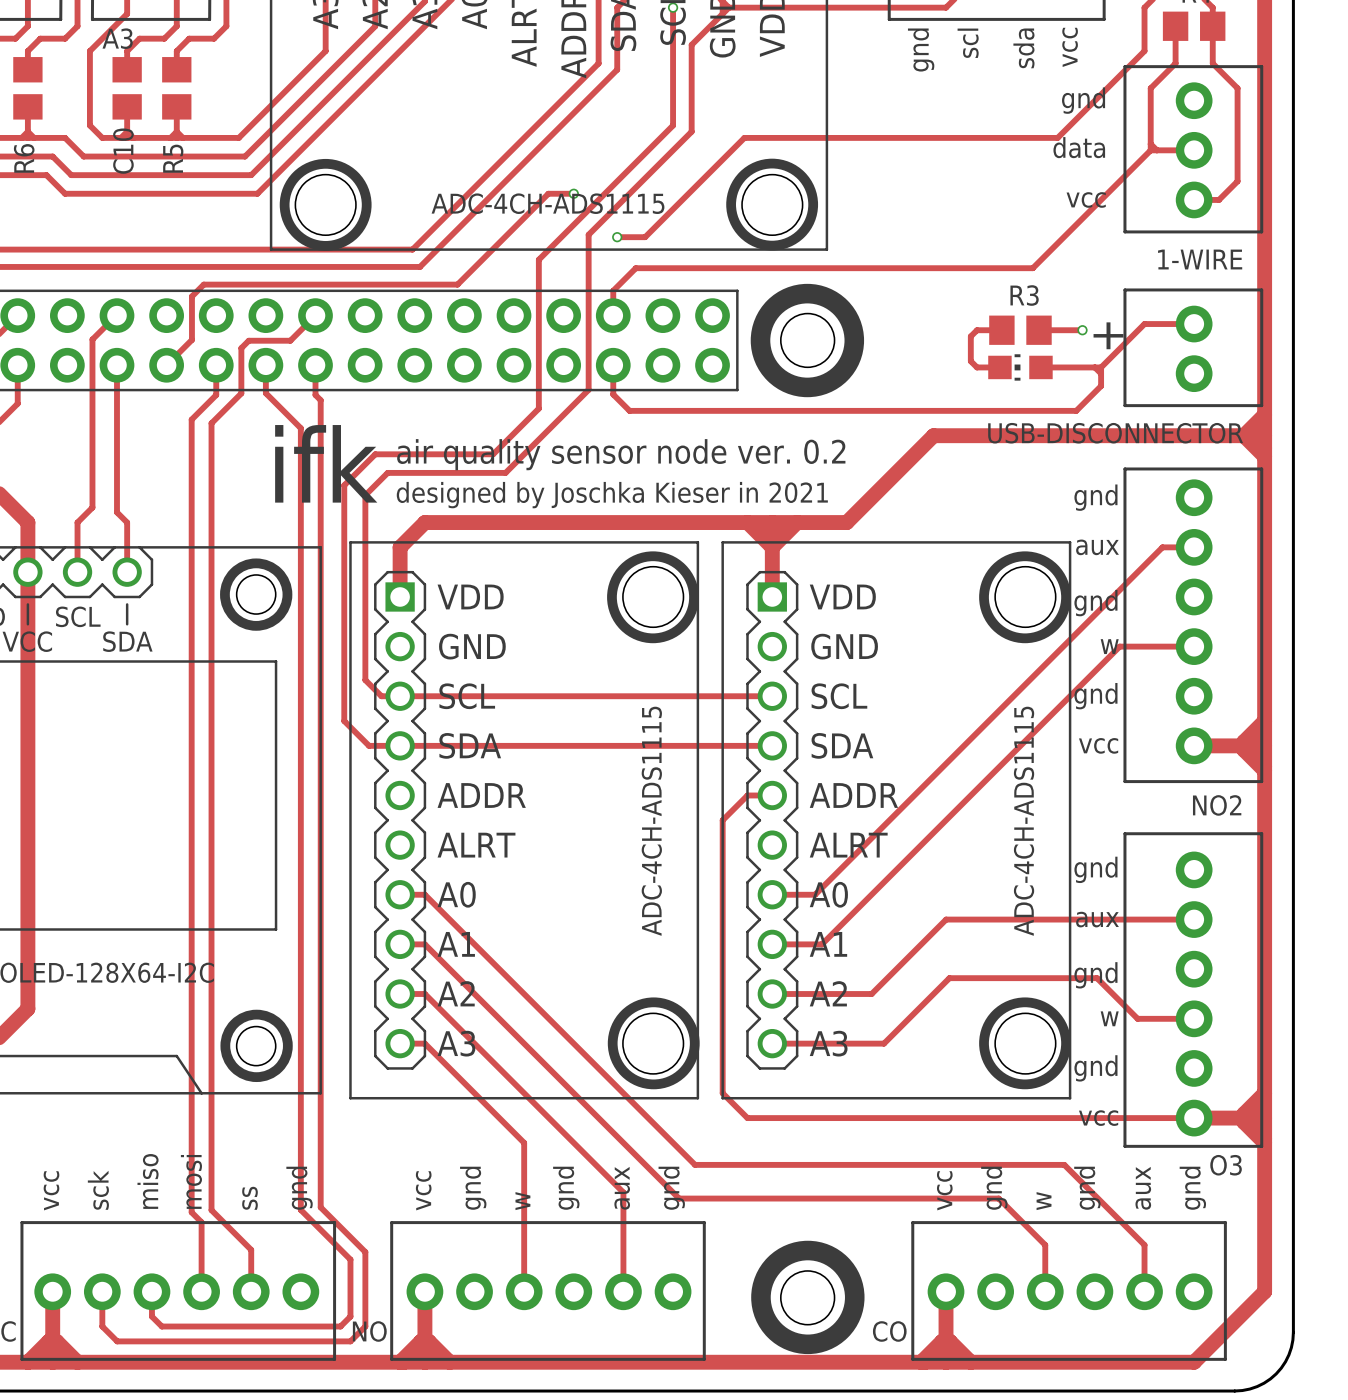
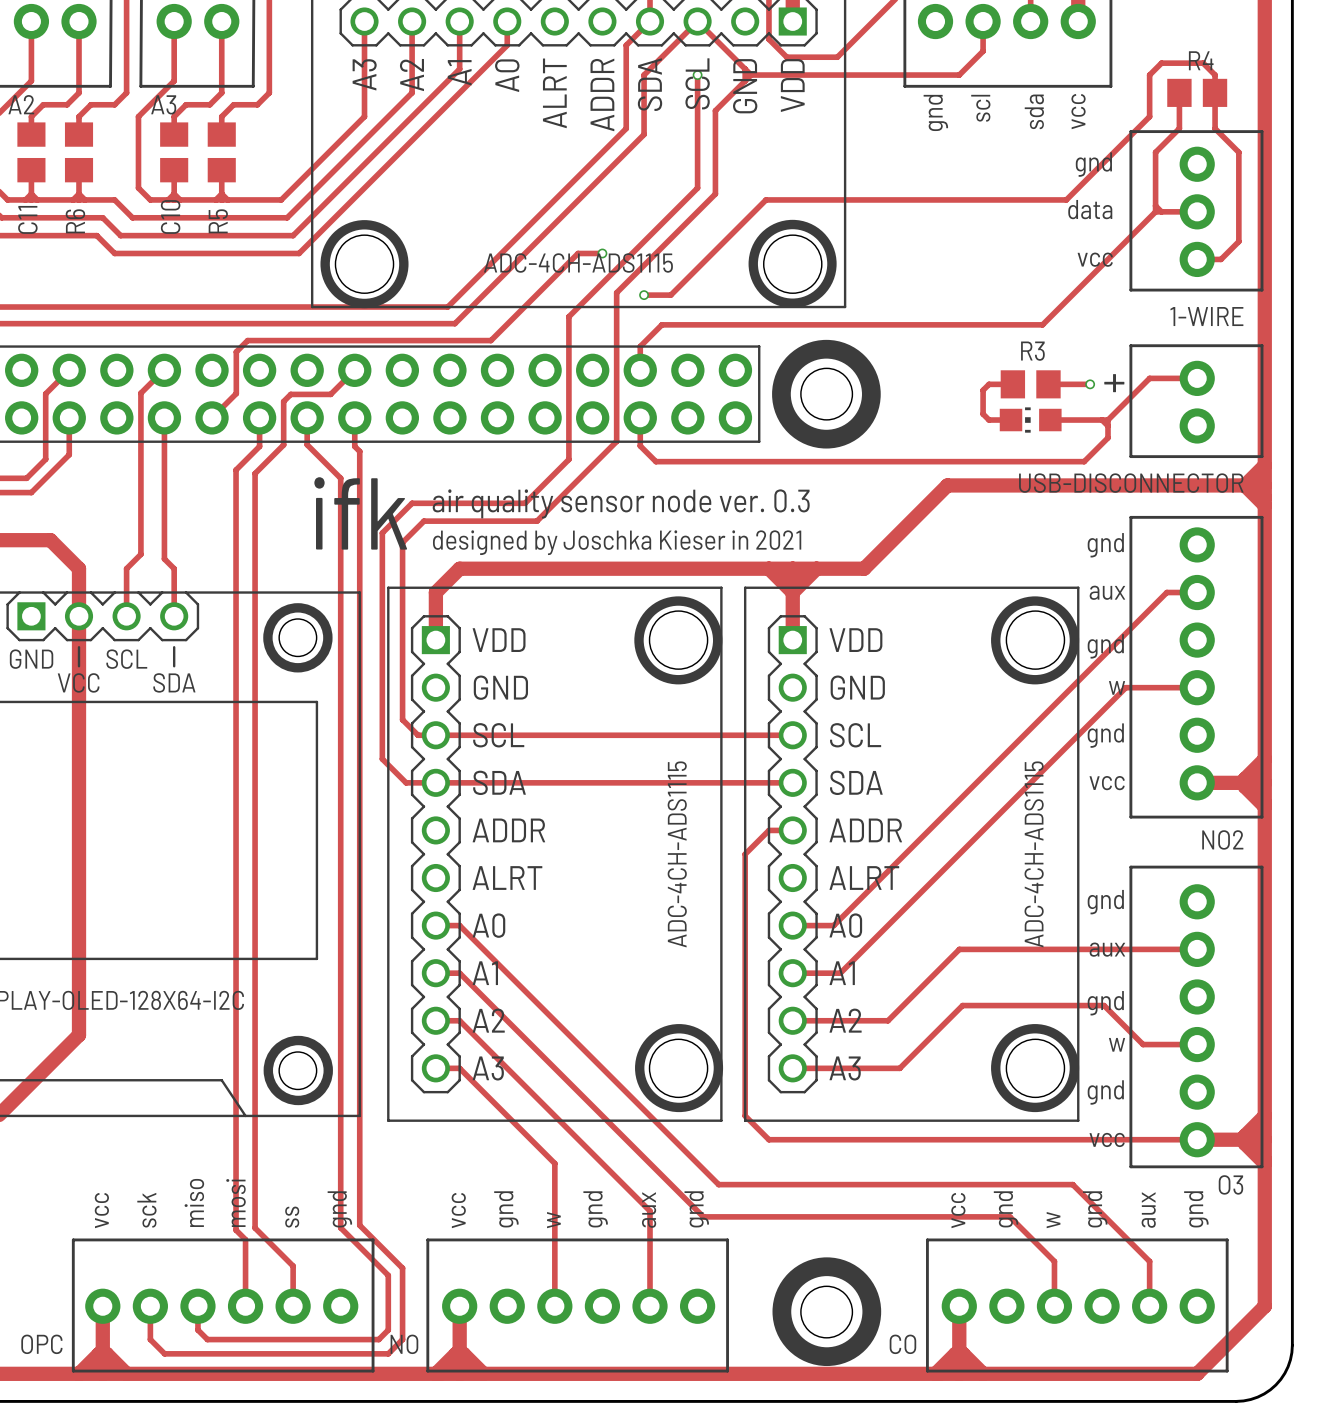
text: air quality sensor node ver. 0.2 (621, 454) -> air quality sensor node ver. 0.3 (621, 503)

